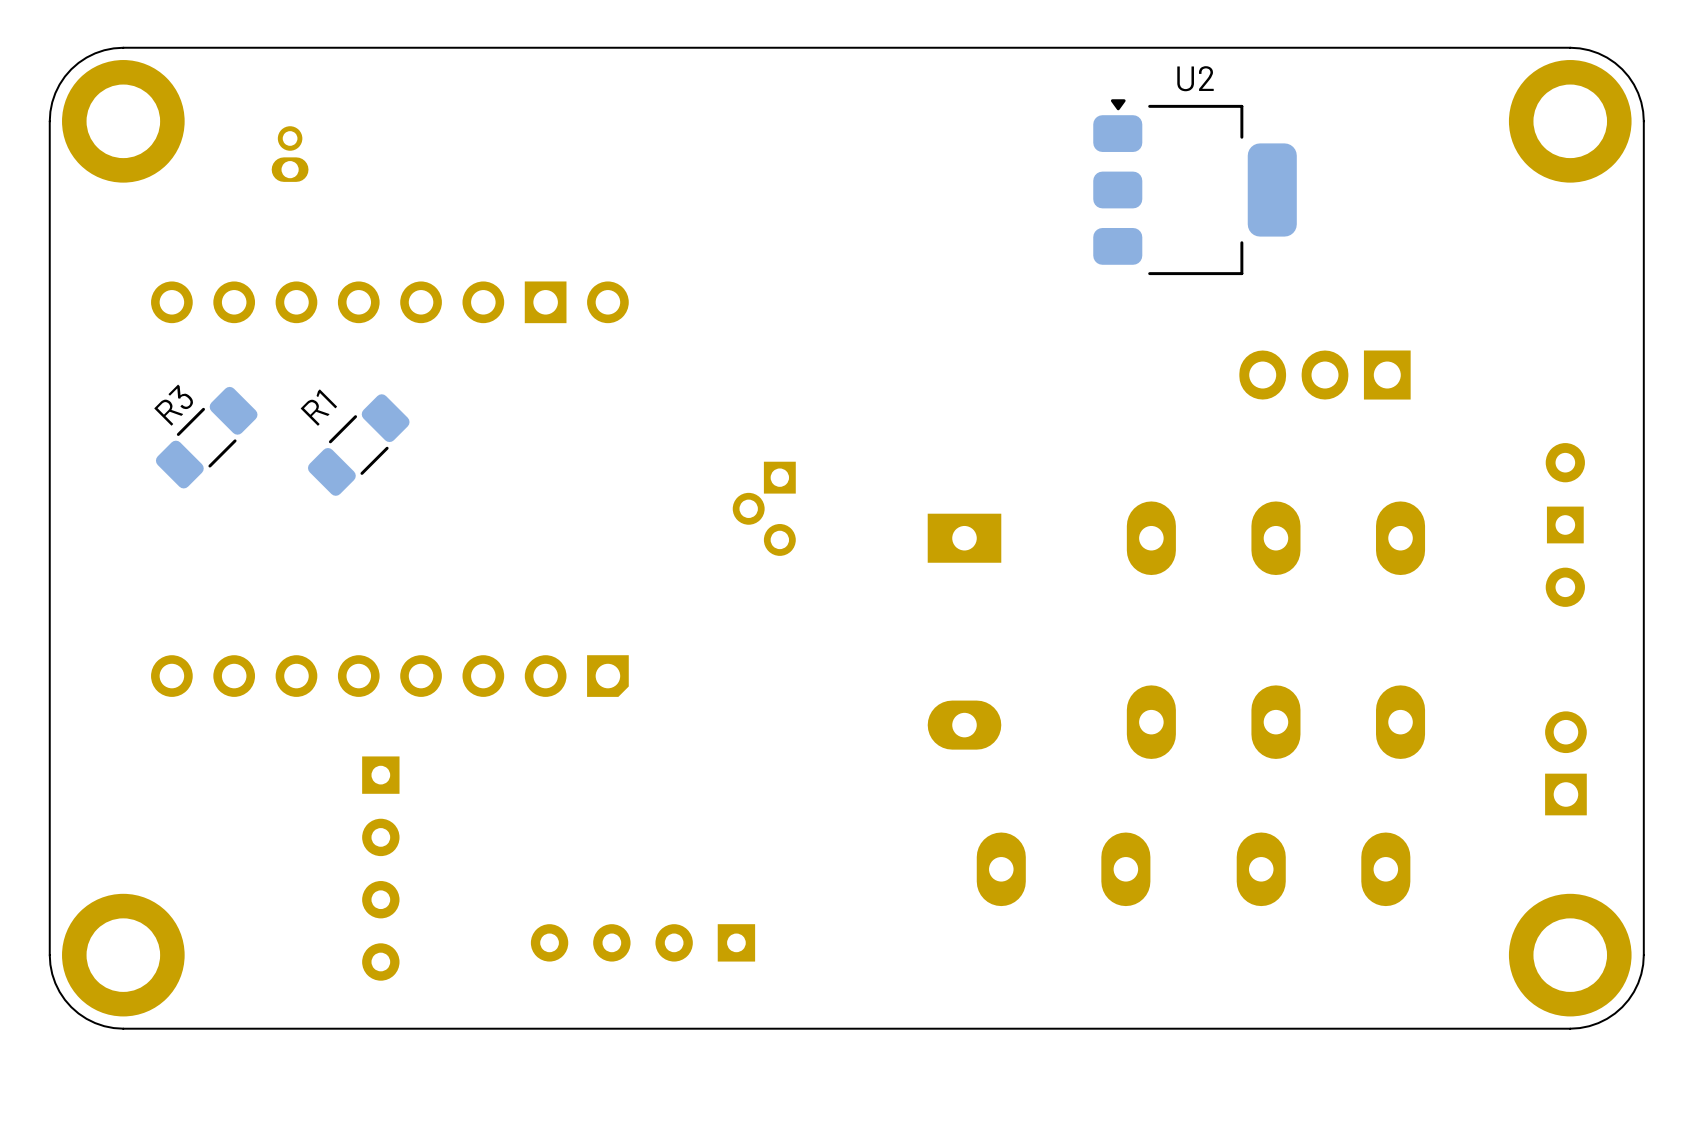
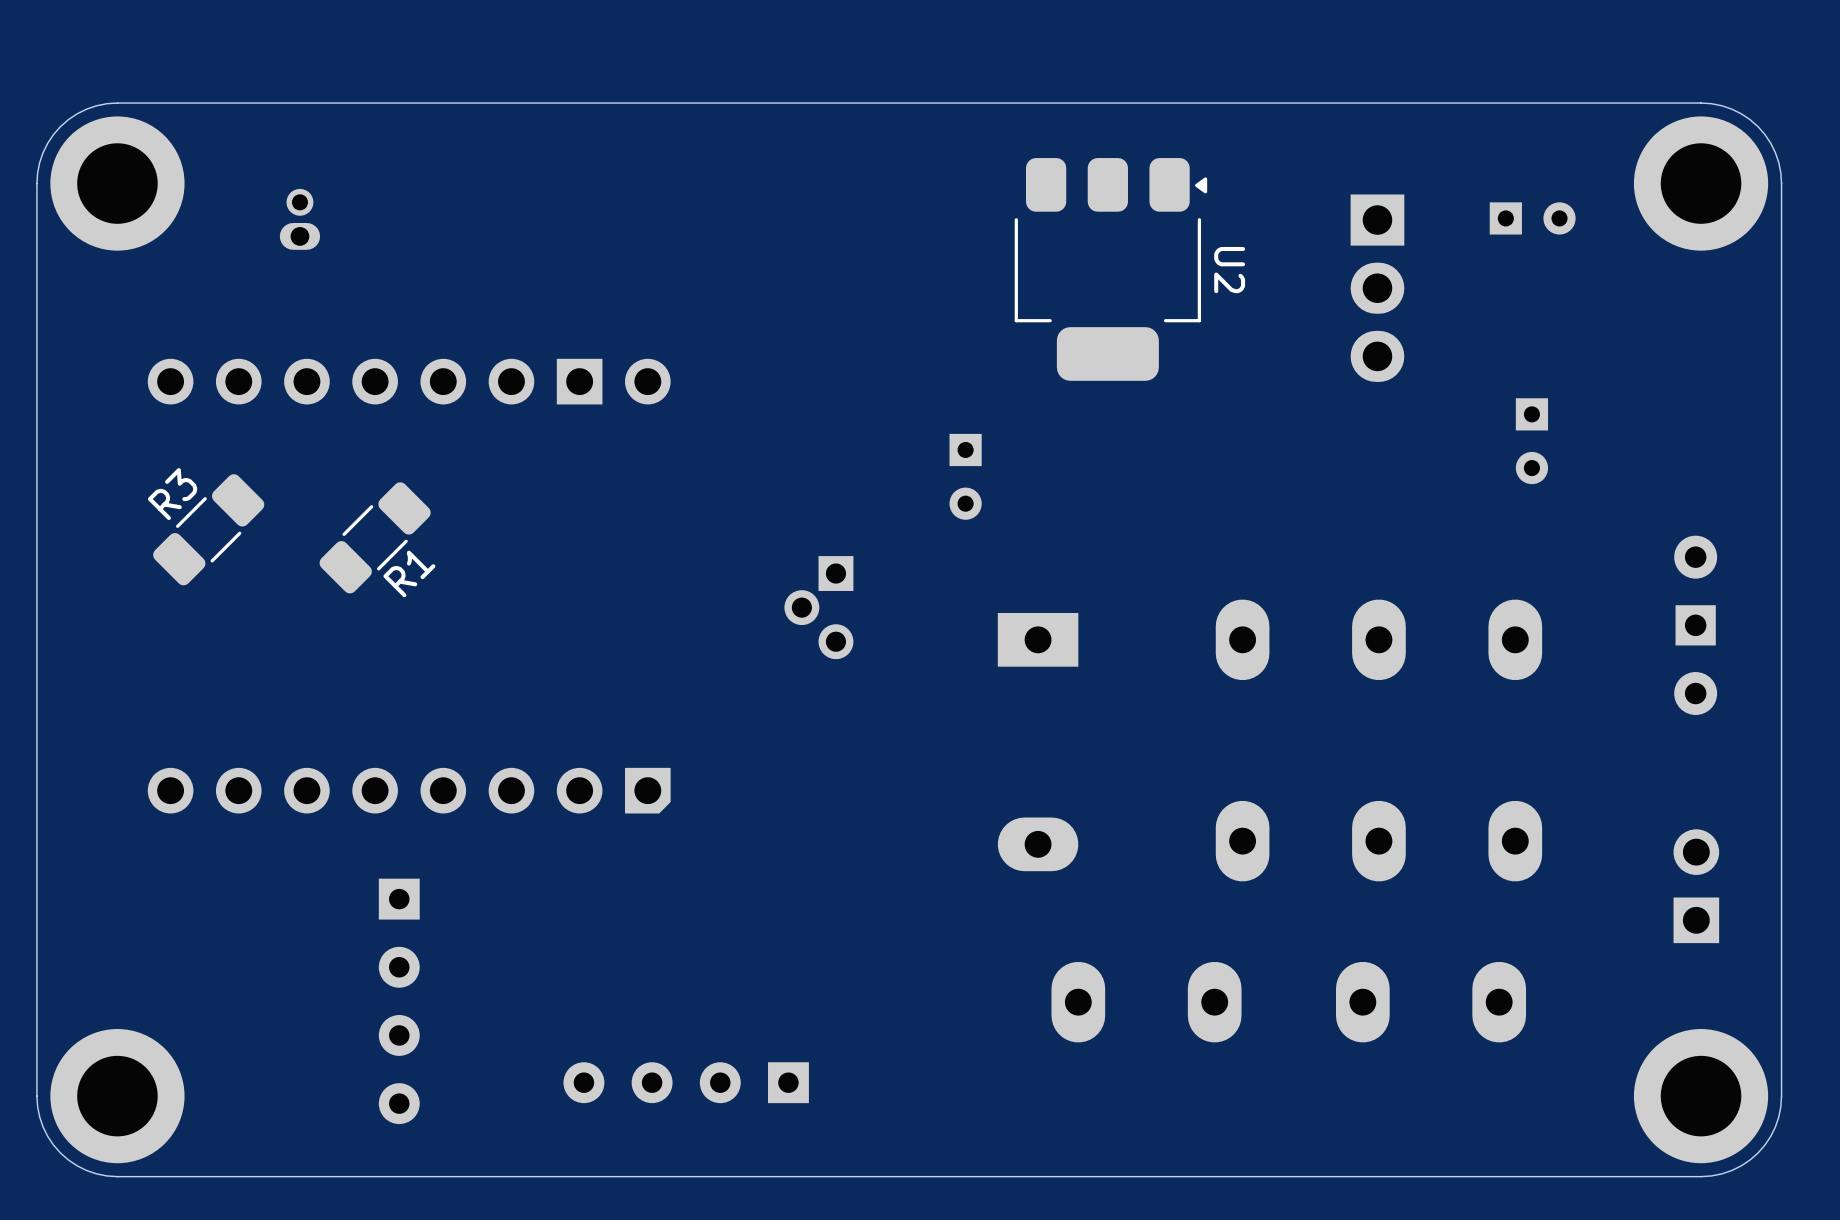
part: none -> (1532, 218)
U2 rotation: 0° (1195, 187) -> 90° clockwise (1110, 269)
U2 position: (1195, 187) -> (1110, 269)
part: none -> (1531, 441)
part rotation: 0° (1325, 375) -> 90° counterclockwise (1377, 288)
part position: (1325, 375) -> (1377, 288)
part: none -> (965, 476)
R1 name position: R1 (318, 407) -> R1 (409, 573)

